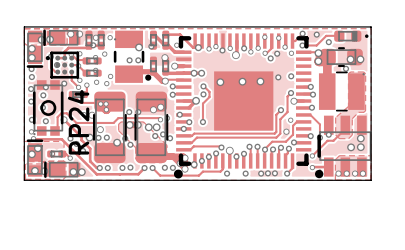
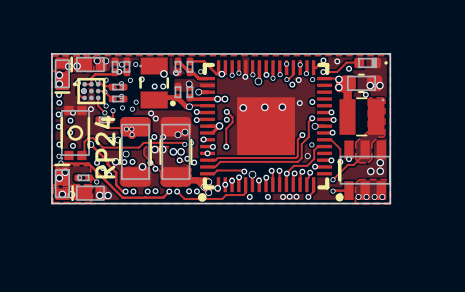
via: none -> (141, 79)
via: none -> (151, 113)
via: none -> (155, 118)

